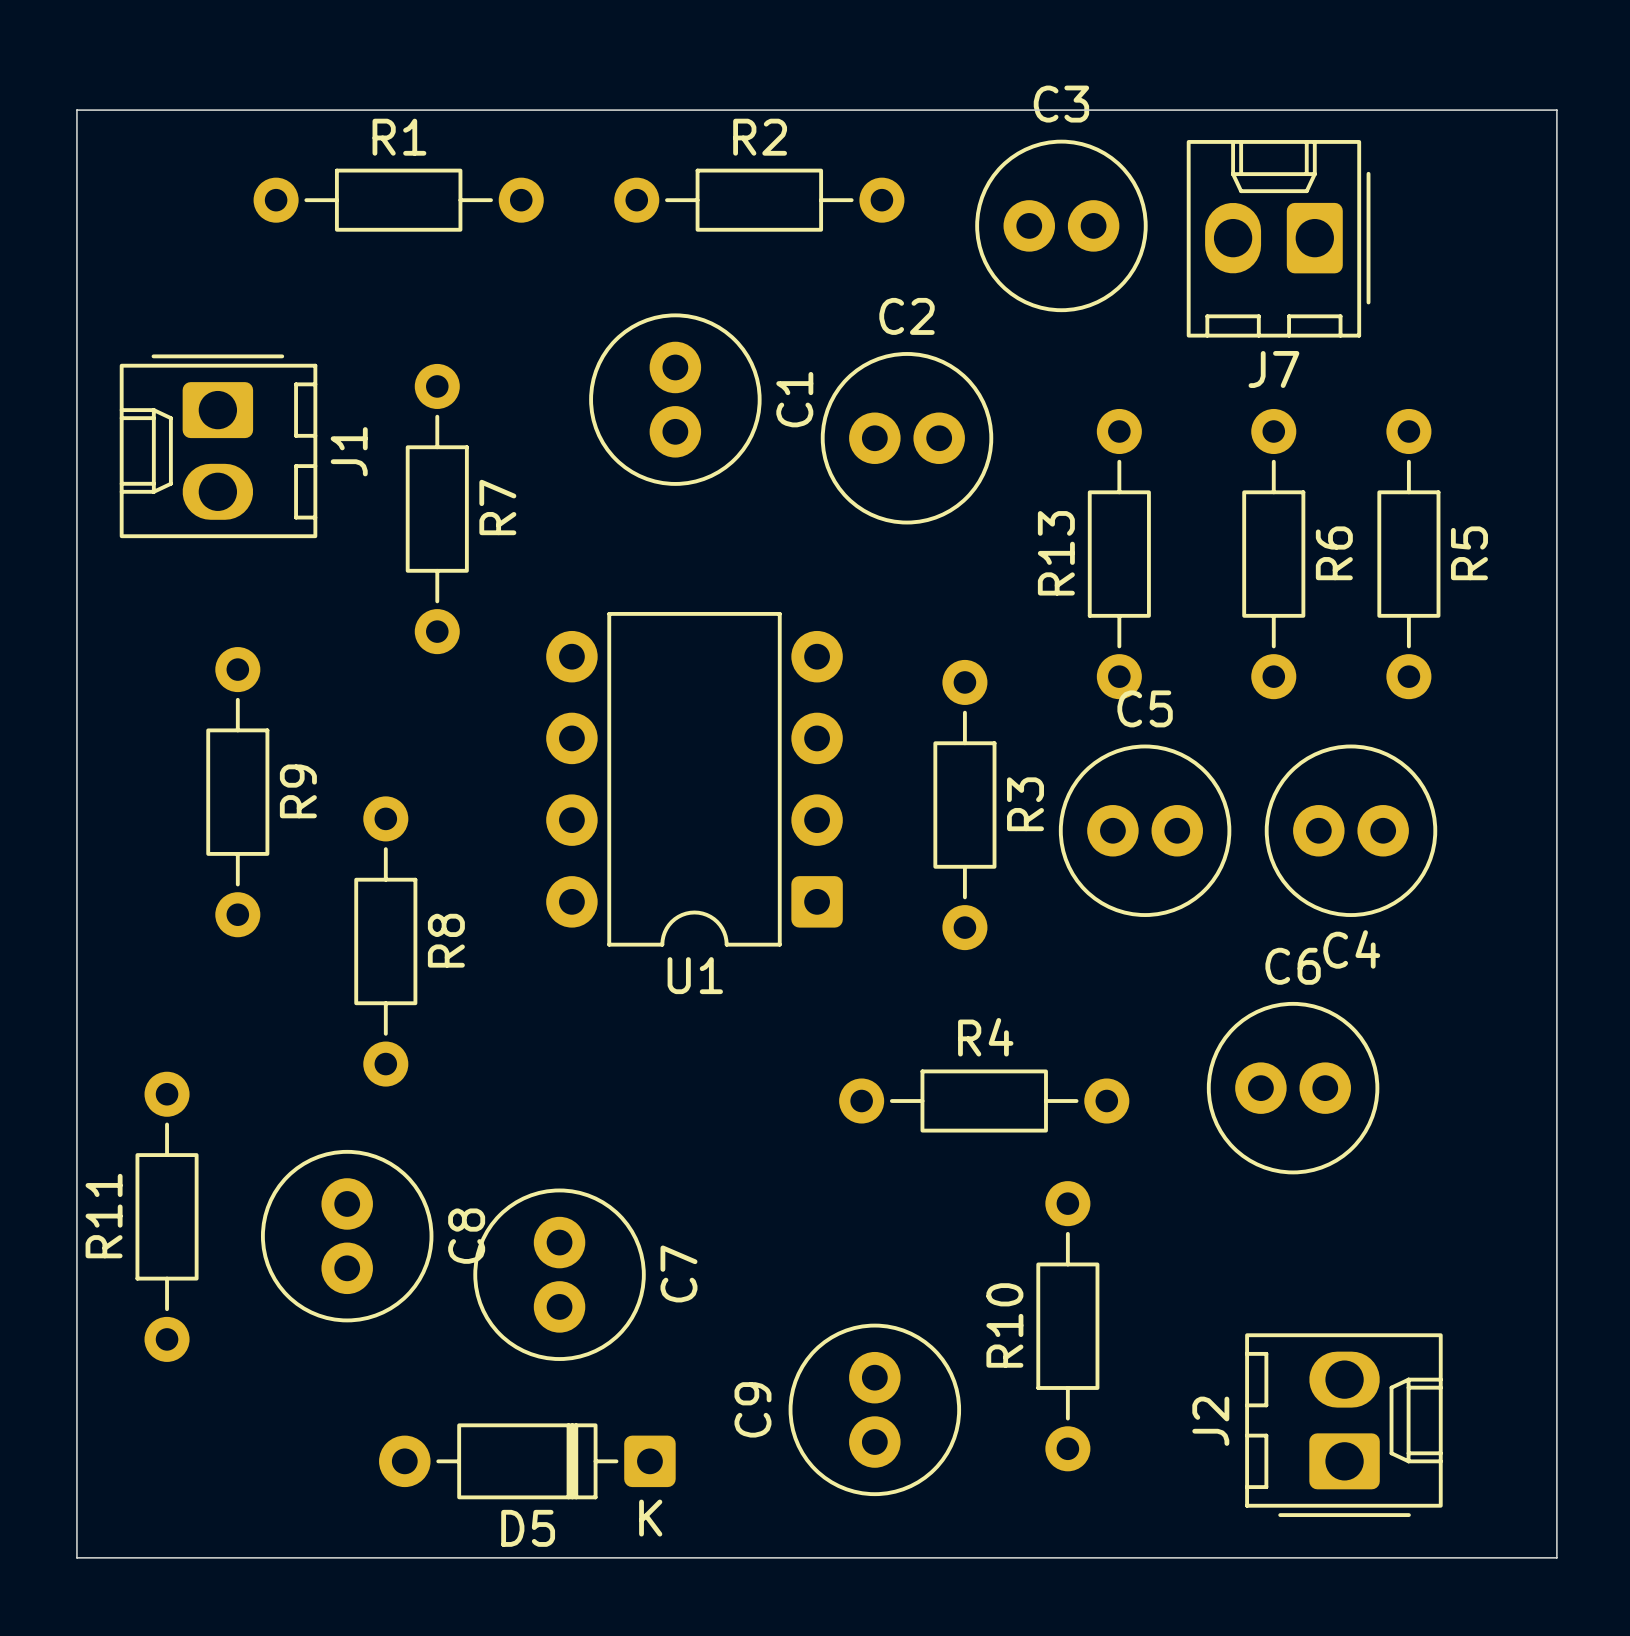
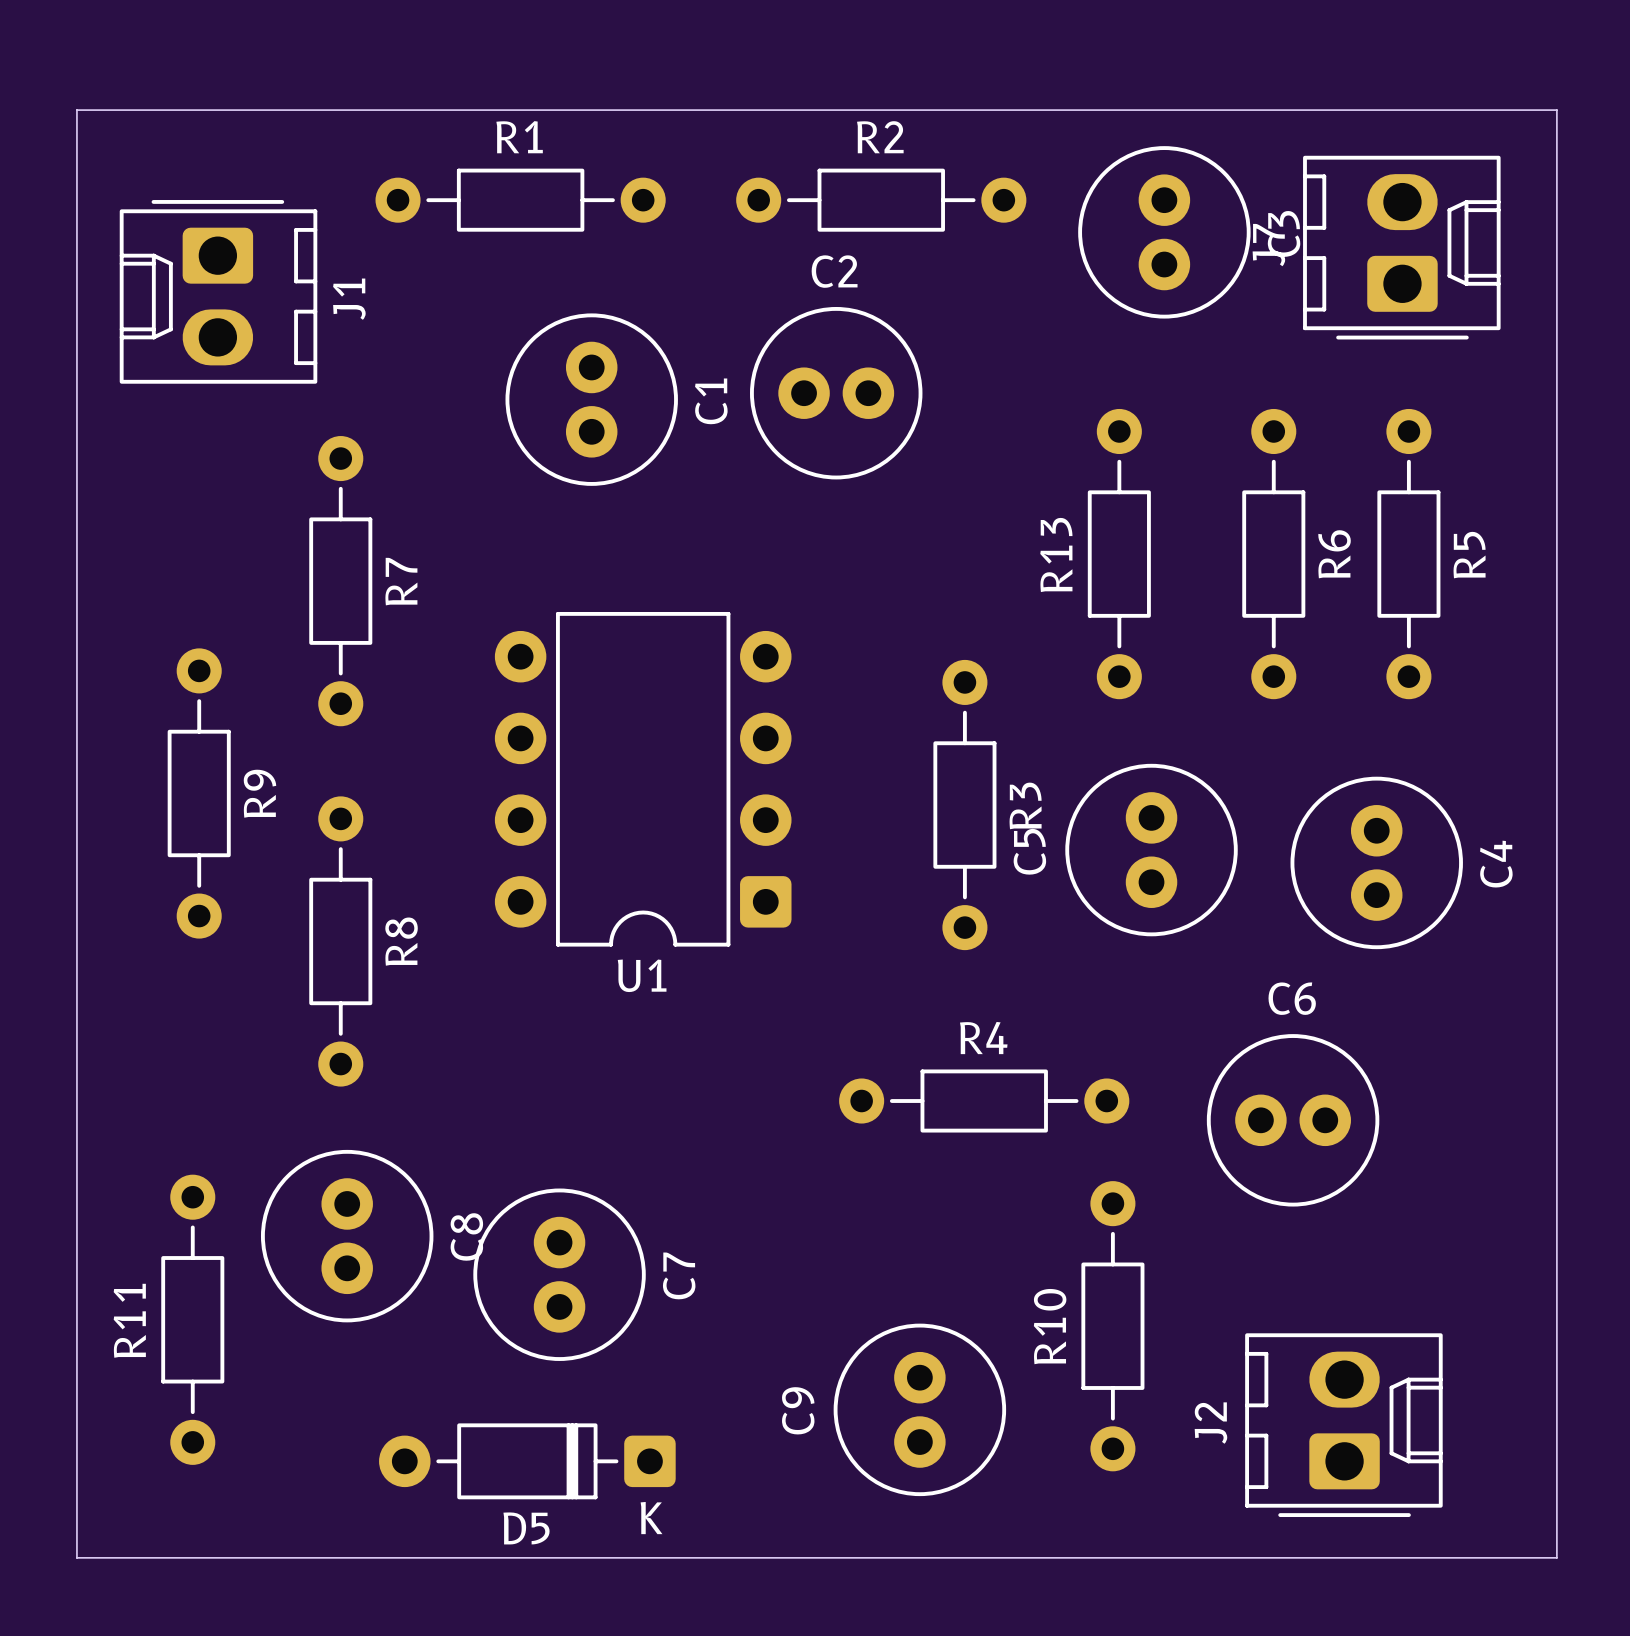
R1 position: (398, 200) -> (520, 200)
R2 position: (759, 200) -> (881, 200)
C3 rotation: 0° (1061, 225) -> 90° clockwise (1164, 232)
J7 rotation: 0° (1278, 238) -> 90° clockwise (1401, 247)
J7 position: (1278, 238) -> (1401, 247)
C1 position: (675, 399) -> (591, 399)
C2 position: (907, 438) -> (836, 393)
J1 position: (218, 446) -> (218, 291)
R7 position: (437, 509) -> (340, 581)
C5 name position: C5 (1145, 708) -> C5 (1029, 851)
U1 position: (694, 779) -> (643, 779)
R9 position: (237, 792) -> (199, 793)
C5 rotation: 0° (1145, 830) -> 90° clockwise (1151, 850)
C4 rotation: 0° (1350, 830) -> 90° clockwise (1376, 862)
R8 position: (385, 941) -> (340, 941)
C4 name position: C4 (1351, 949) -> C4 (1496, 864)
C6 position: (1293, 1088) -> (1293, 1120)
R11 position: (167, 1216) -> (192, 1319)
R10 position: (1067, 1326) -> (1112, 1326)
C9 position: (874, 1409) -> (919, 1409)

